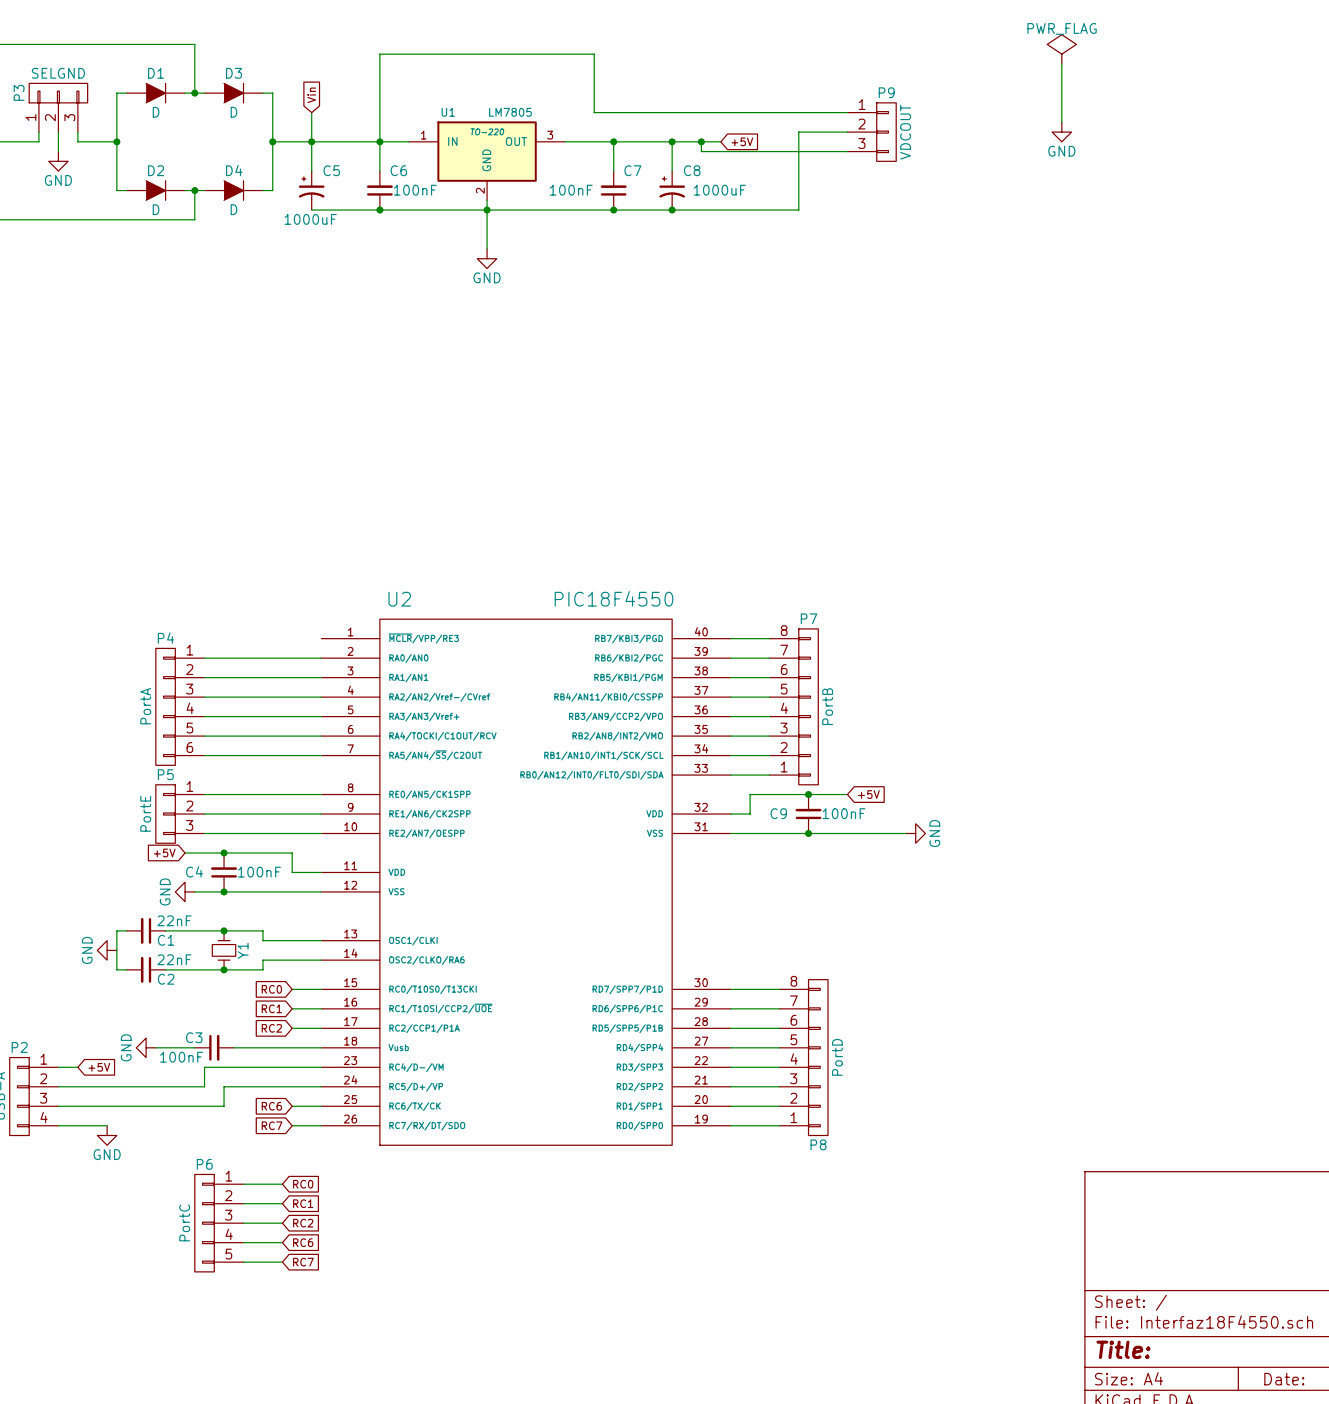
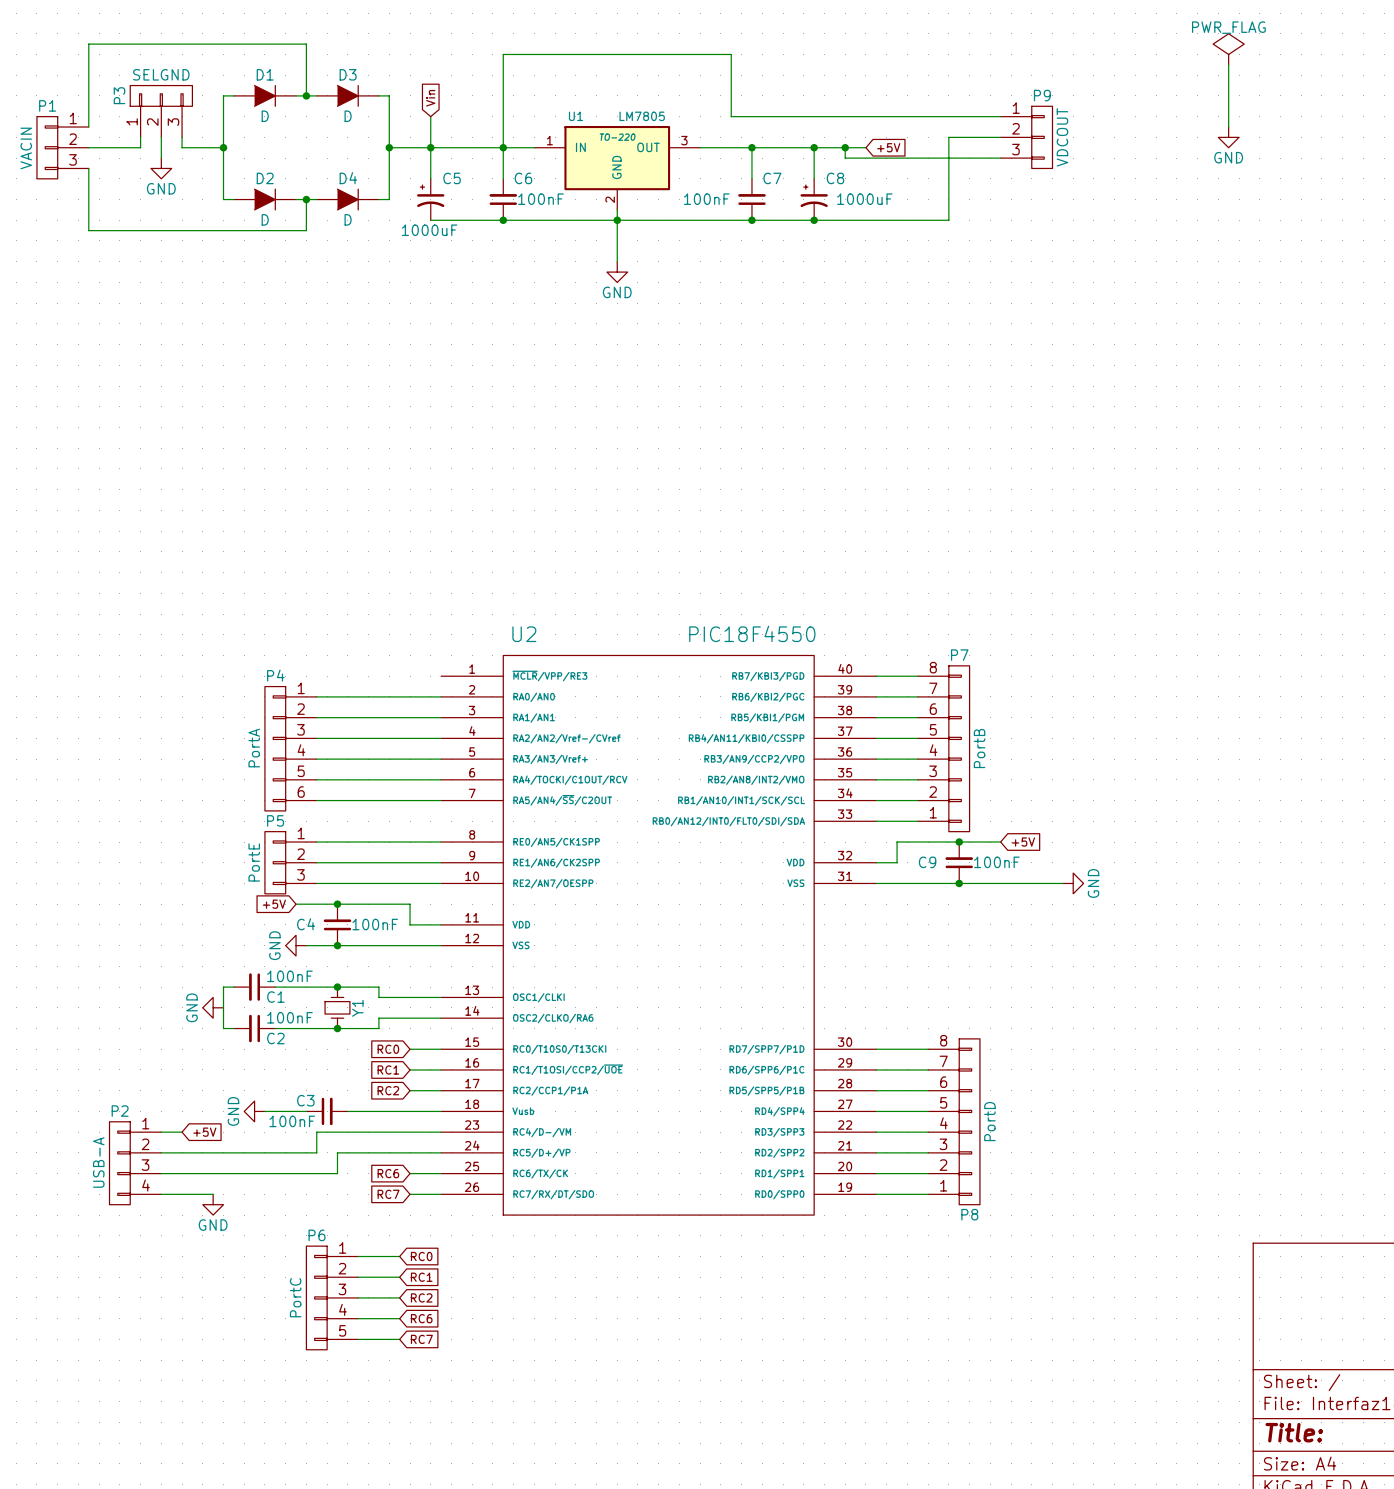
C1 value: 22nF (174, 920) -> 100nF (289, 976)
C2 value: 22nF (174, 959) -> 100nF (289, 1017)

